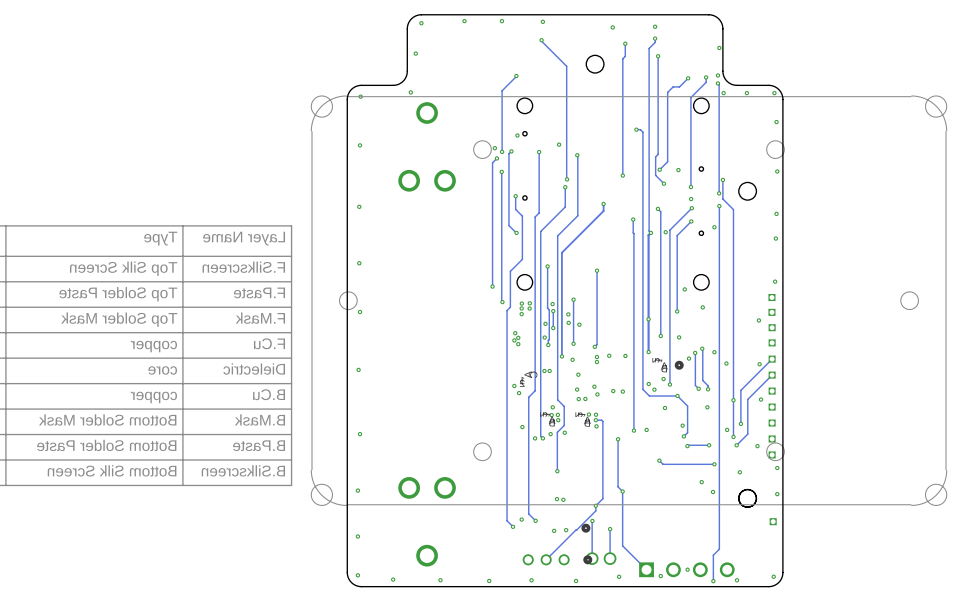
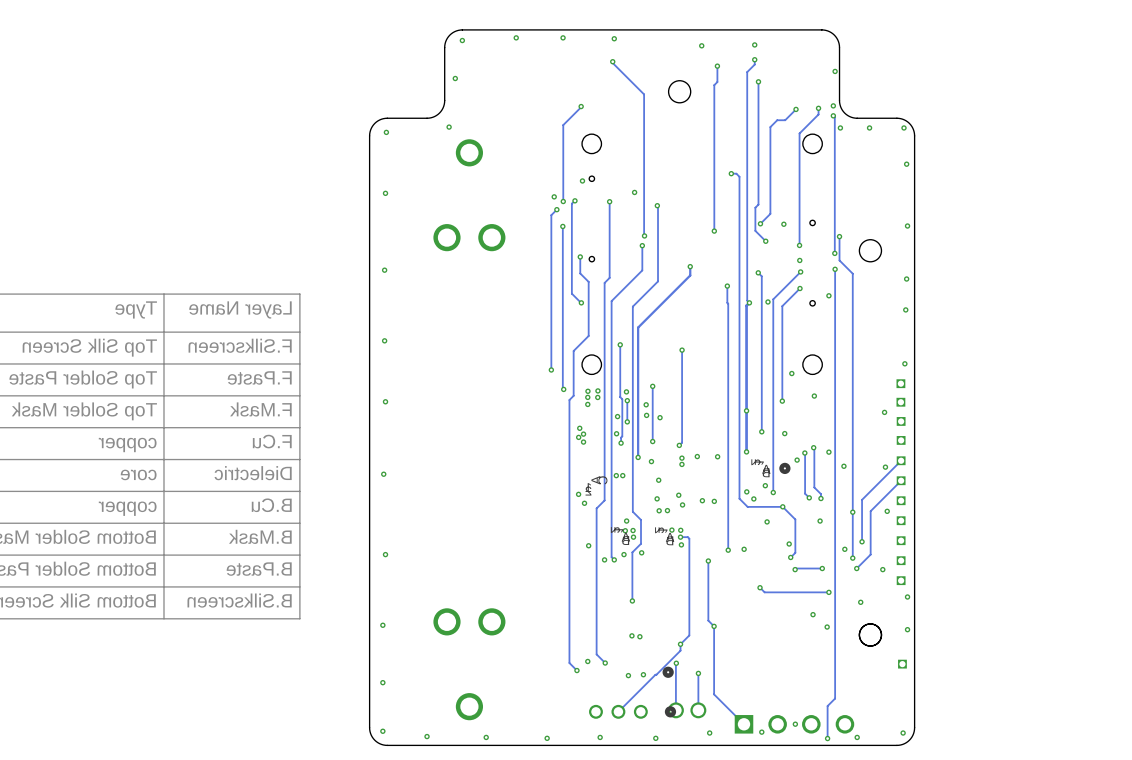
drawing: [310, 95, 948, 506] -> none
drawing: [473, 140, 492, 159] -> none
drawing: [766, 140, 785, 159] -> none
drawing: [339, 291, 358, 311] -> none
drawing: [900, 291, 919, 311] -> none
drawing: [473, 442, 492, 462] -> none
drawing: [766, 442, 785, 462] -> none

